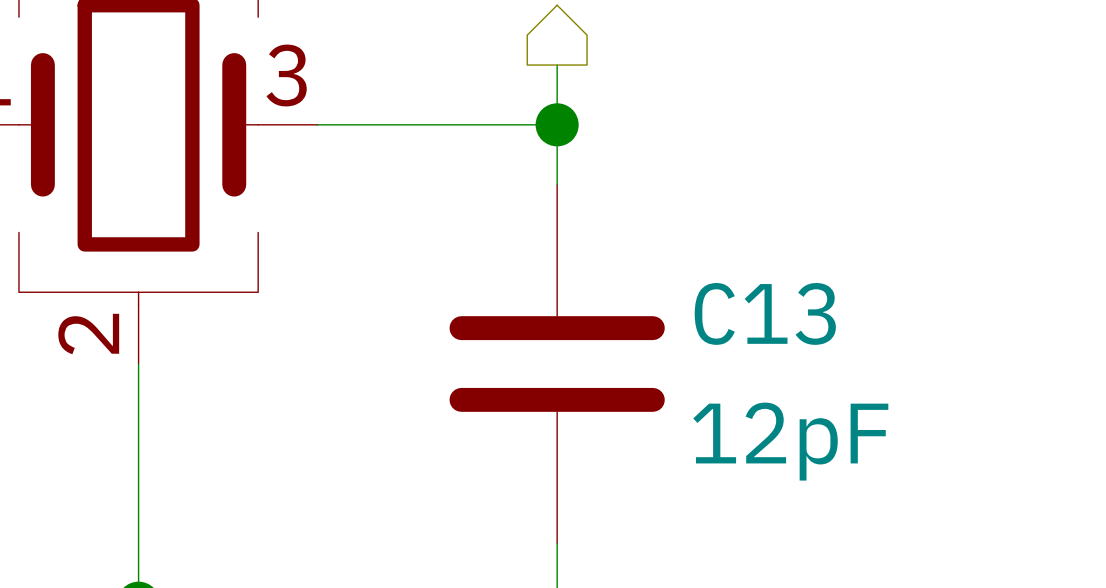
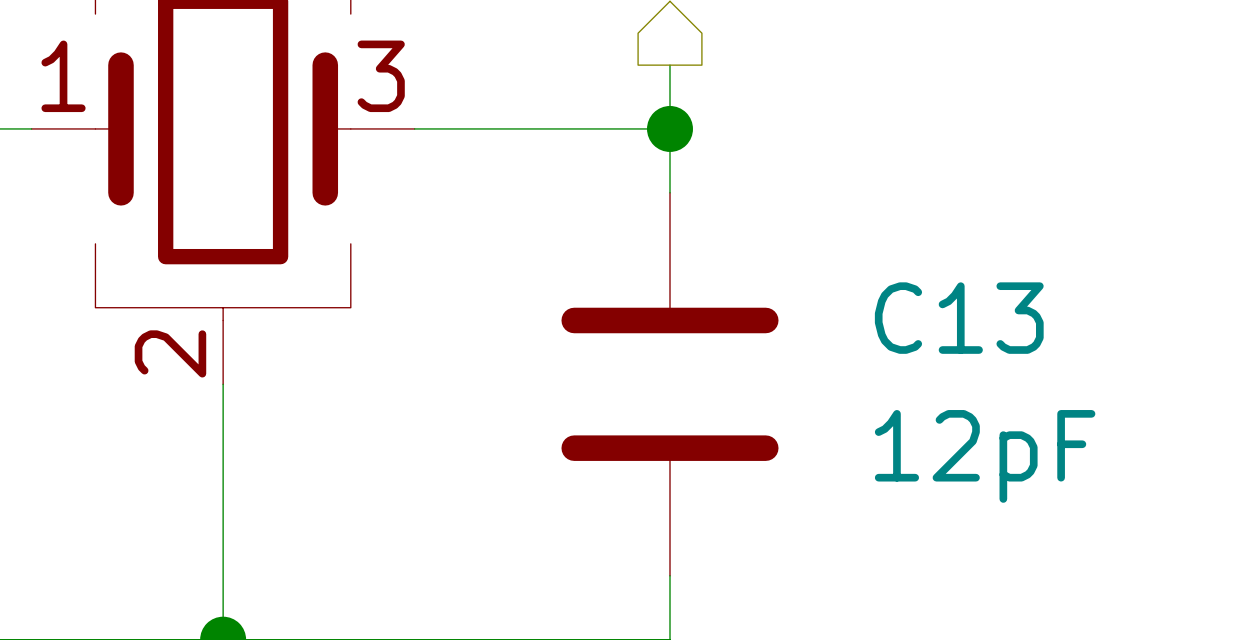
C13 symbol: [449, 184, 665, 544] -> [561, 192, 779, 576]
C13 name position: C13 (765, 313) -> C13 (959, 318)
C13 value position: 12pF (790, 441) -> 12pF (985, 456)

